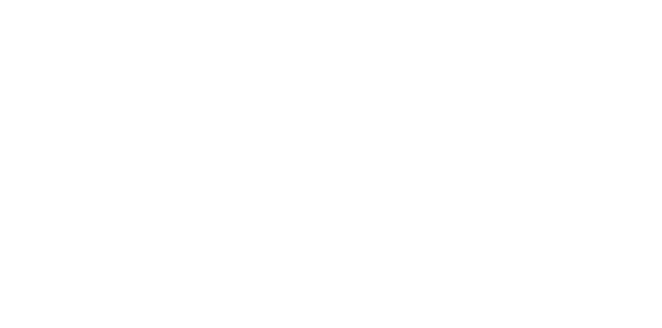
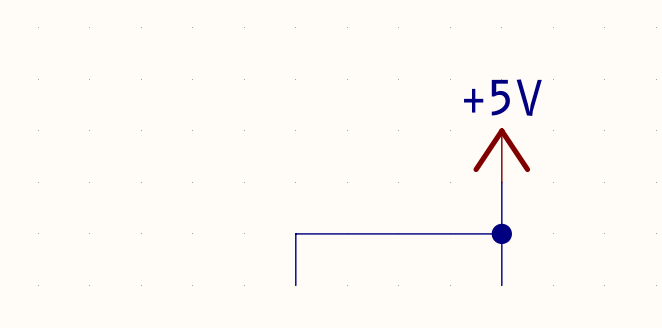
power symbol: none -> +5V (501, 155)
wire: none -> (501, 182) (501, 285)
wire: none -> (501, 233) (295, 233) (295, 285)
junction: none -> (501, 233)

